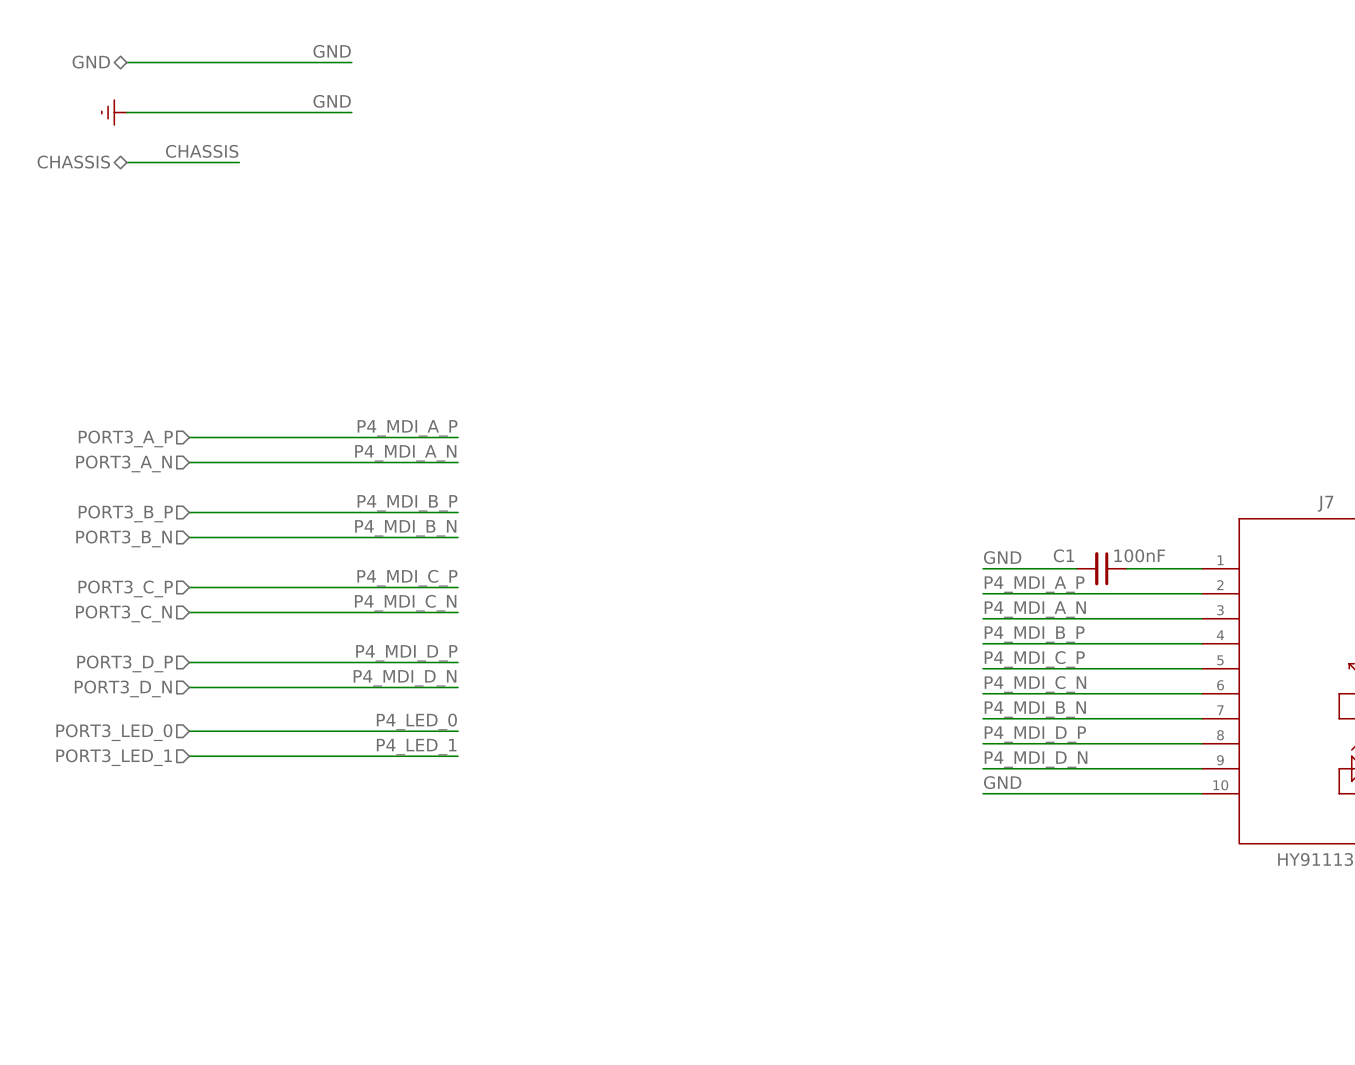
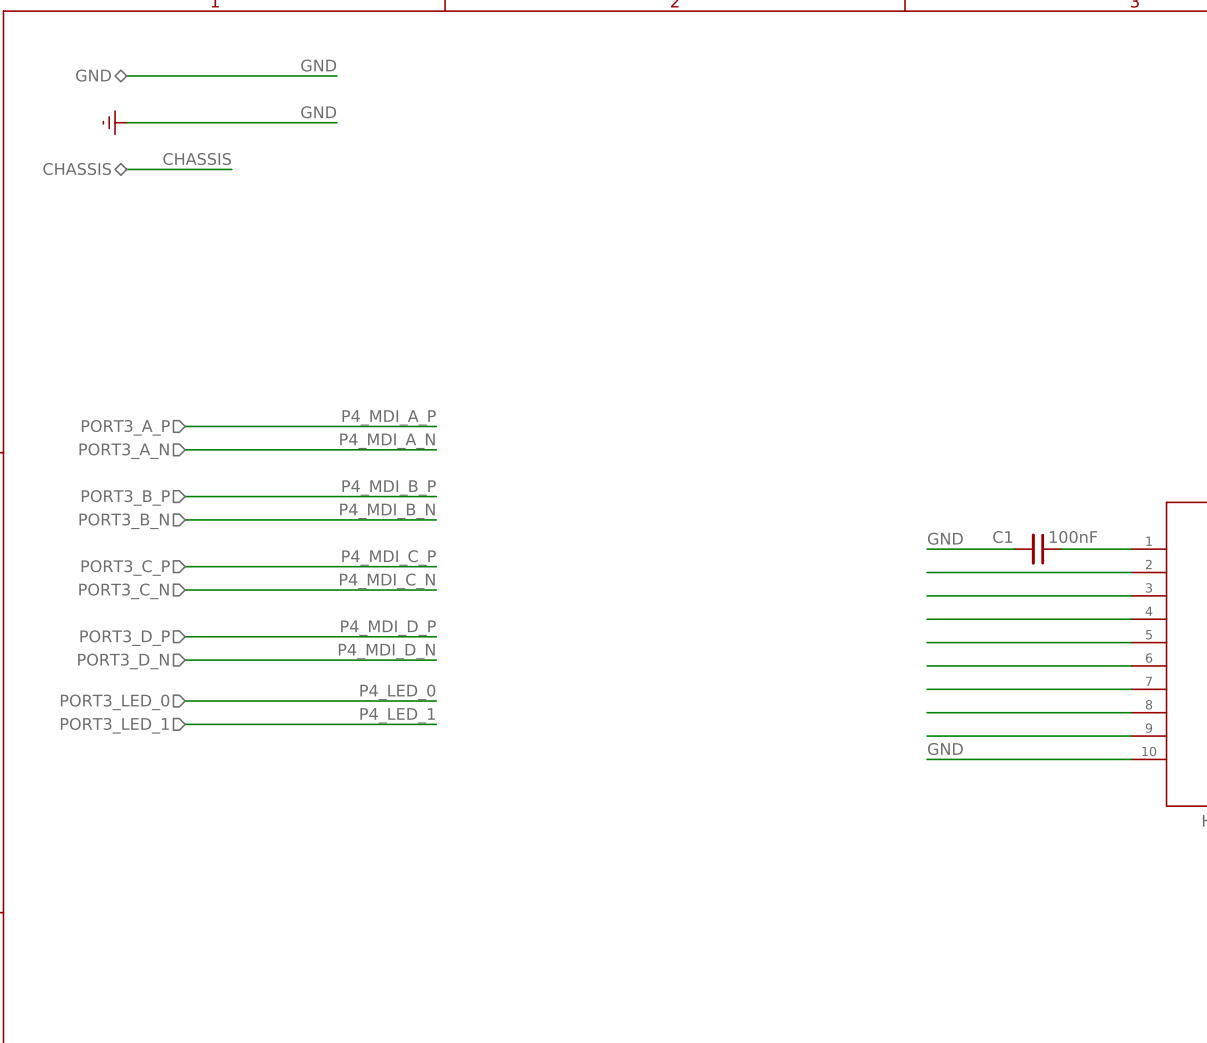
label: P4_MDI_A_P (1034, 584) -> none
label: P4_MDI_A_N (1035, 609) -> none
label: P4_MDI_B_P (1034, 634) -> none
label: P4_MDI_C_P (1034, 659) -> none
label: P4_MDI_C_N (1035, 684) -> none
label: P4_MDI_B_N (1035, 709) -> none
label: P4_MDI_D_P (1035, 734) -> none
label: P4_MDI_D_N (1036, 759) -> none

